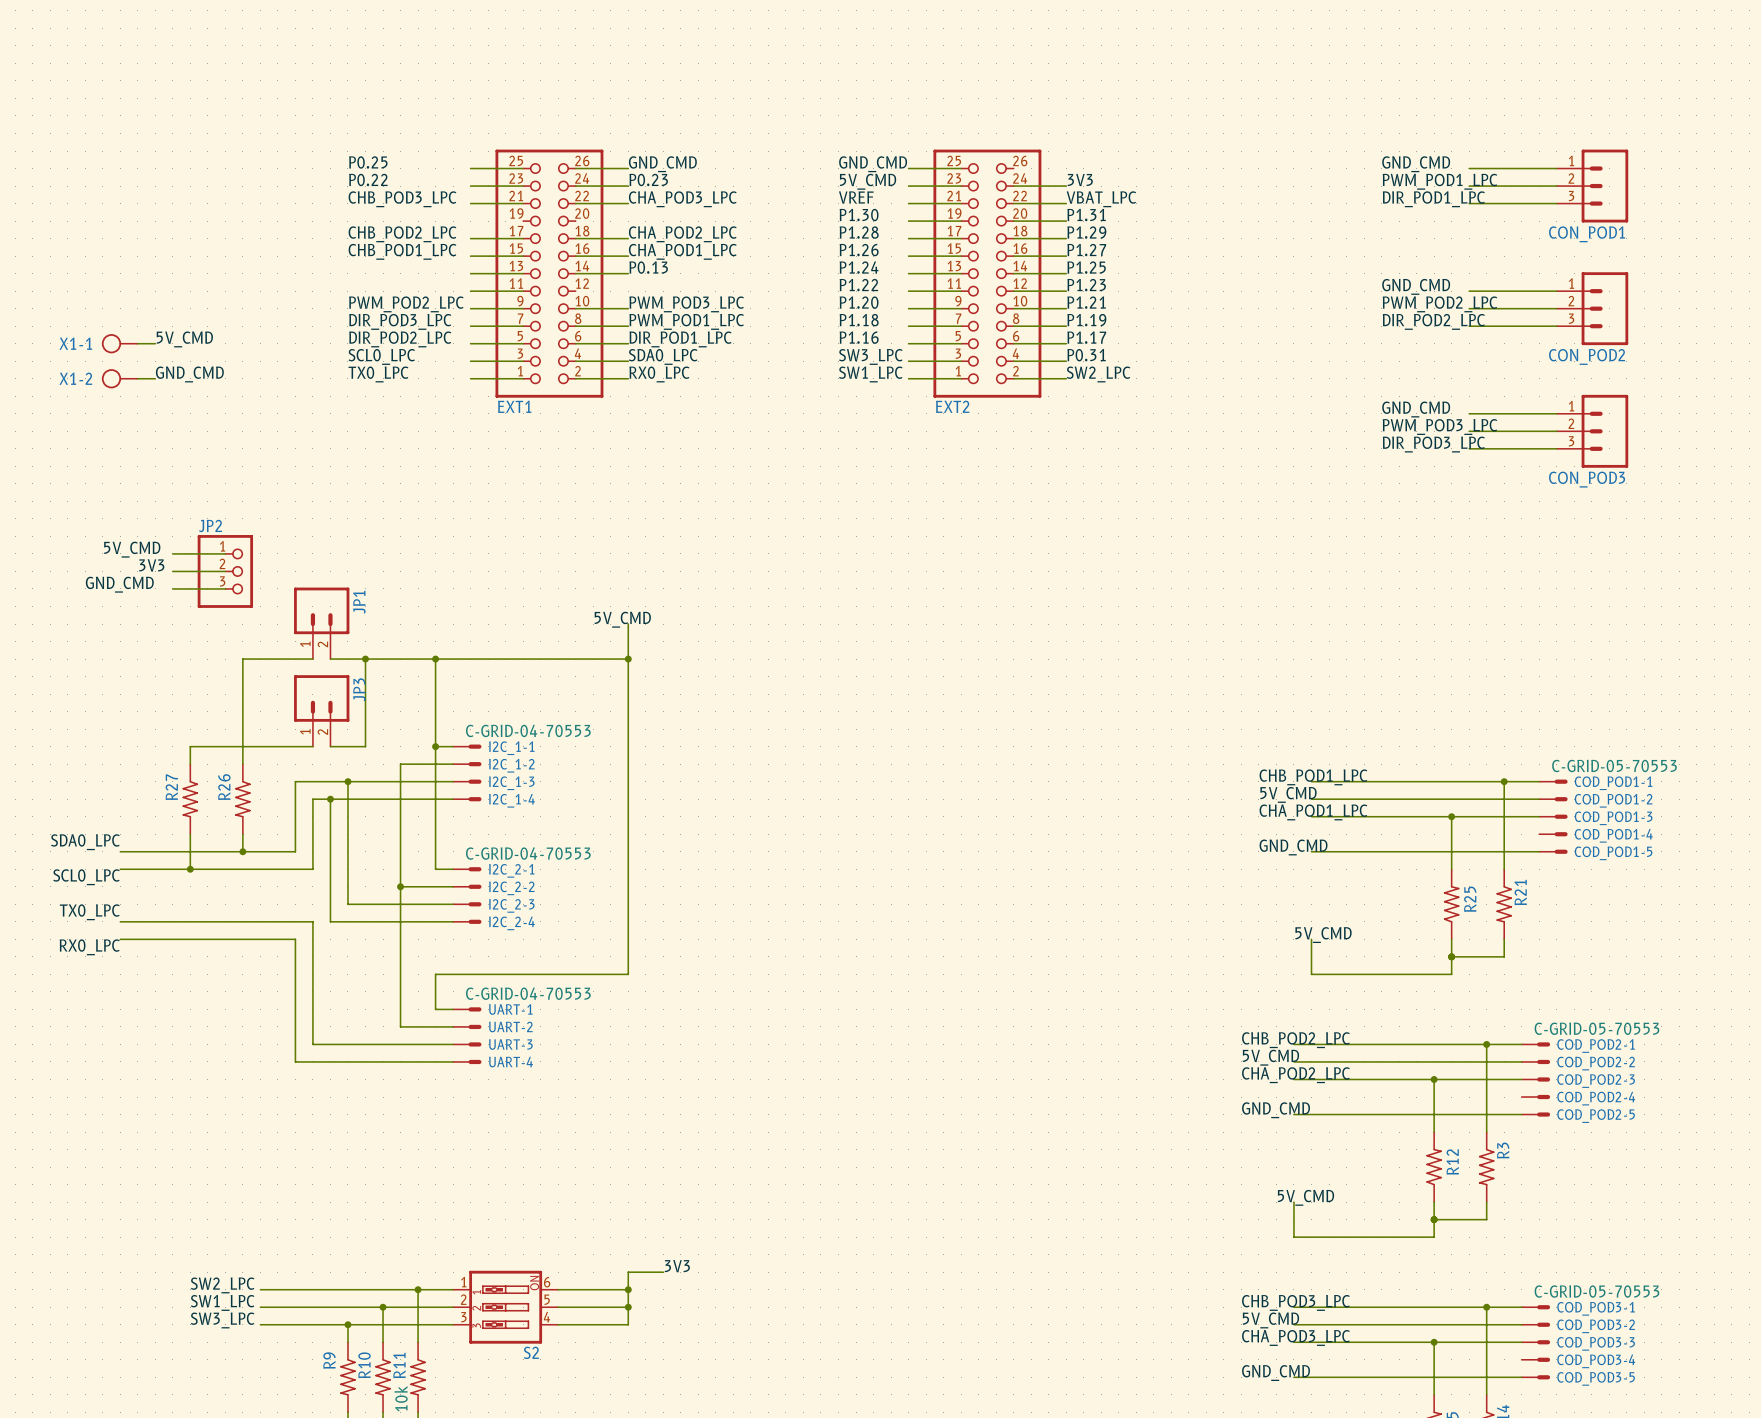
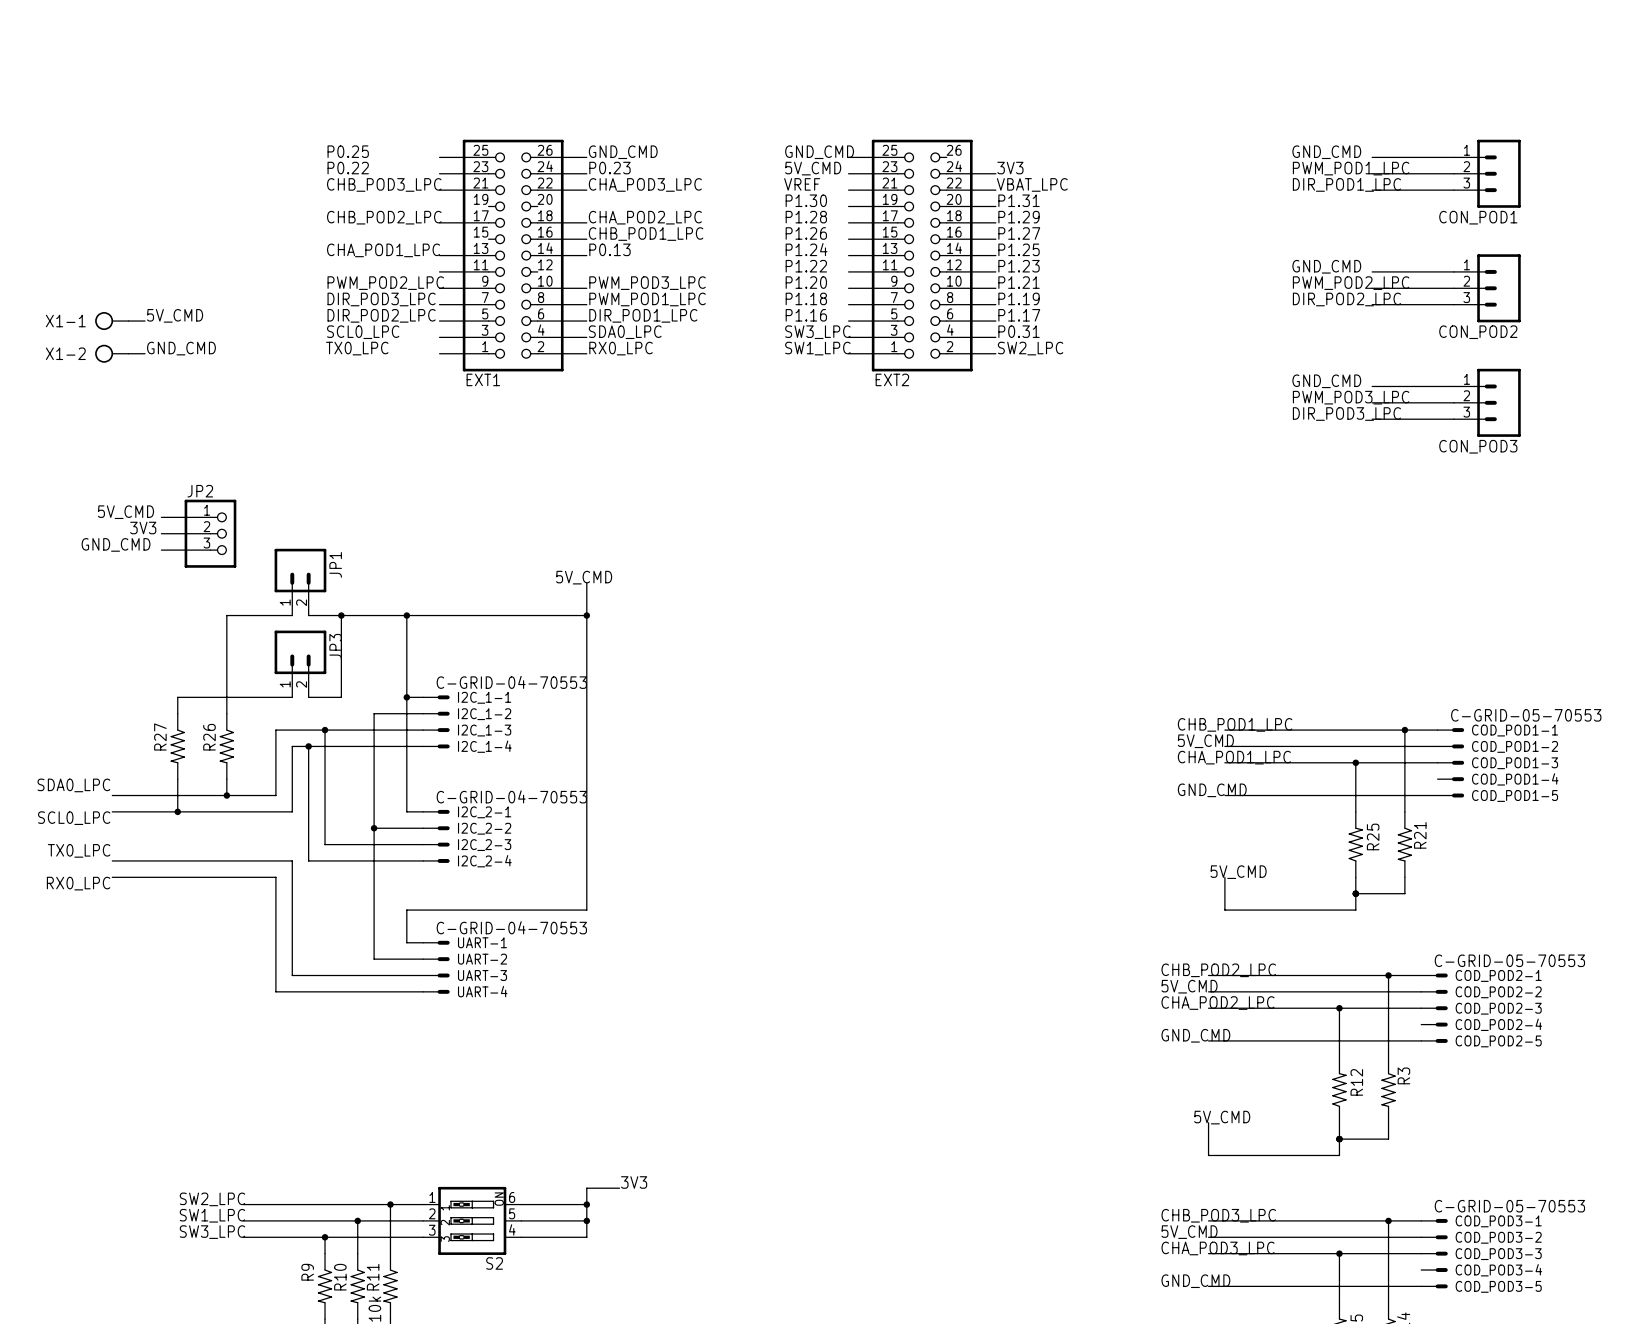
label: CHB_POD1_LPC (402, 251) -> CHA_POD1_LPC (383, 250)
label: CHA_POD1_LPC (682, 251) -> CHB_POD1_LPC (646, 234)
wire: (470, 256) (523, 256) -> none

